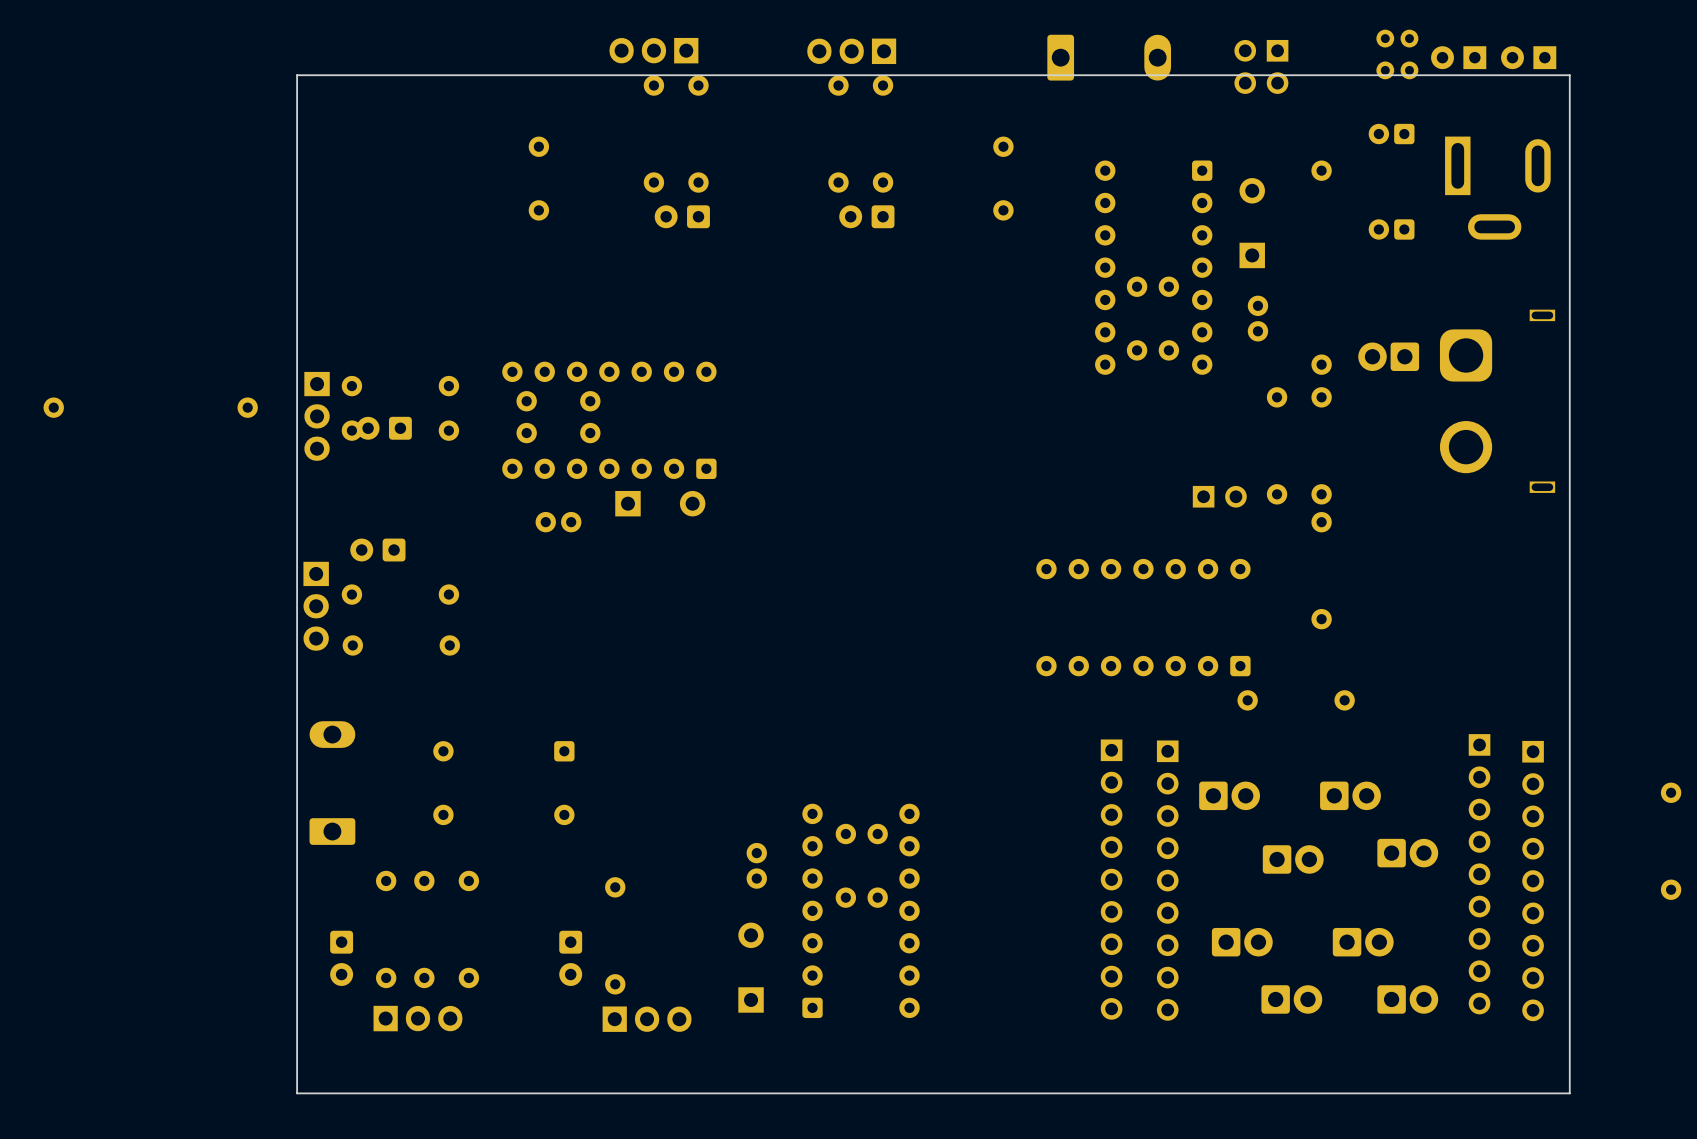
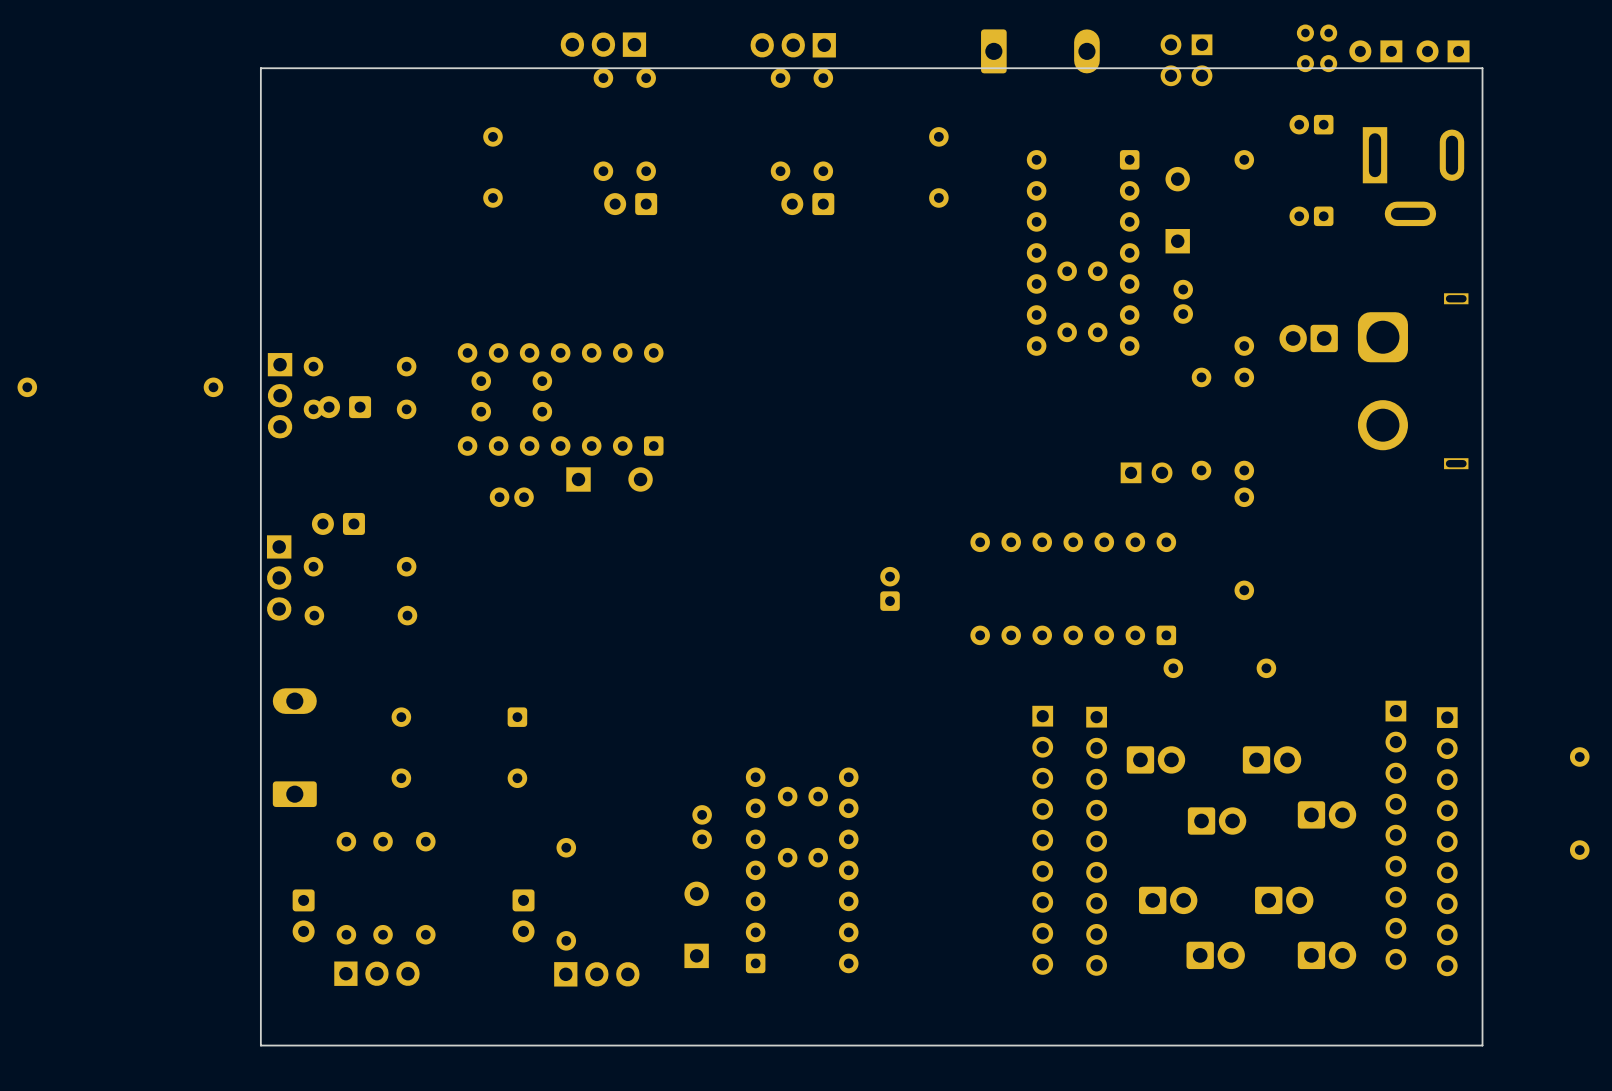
part: none -> (890, 588)

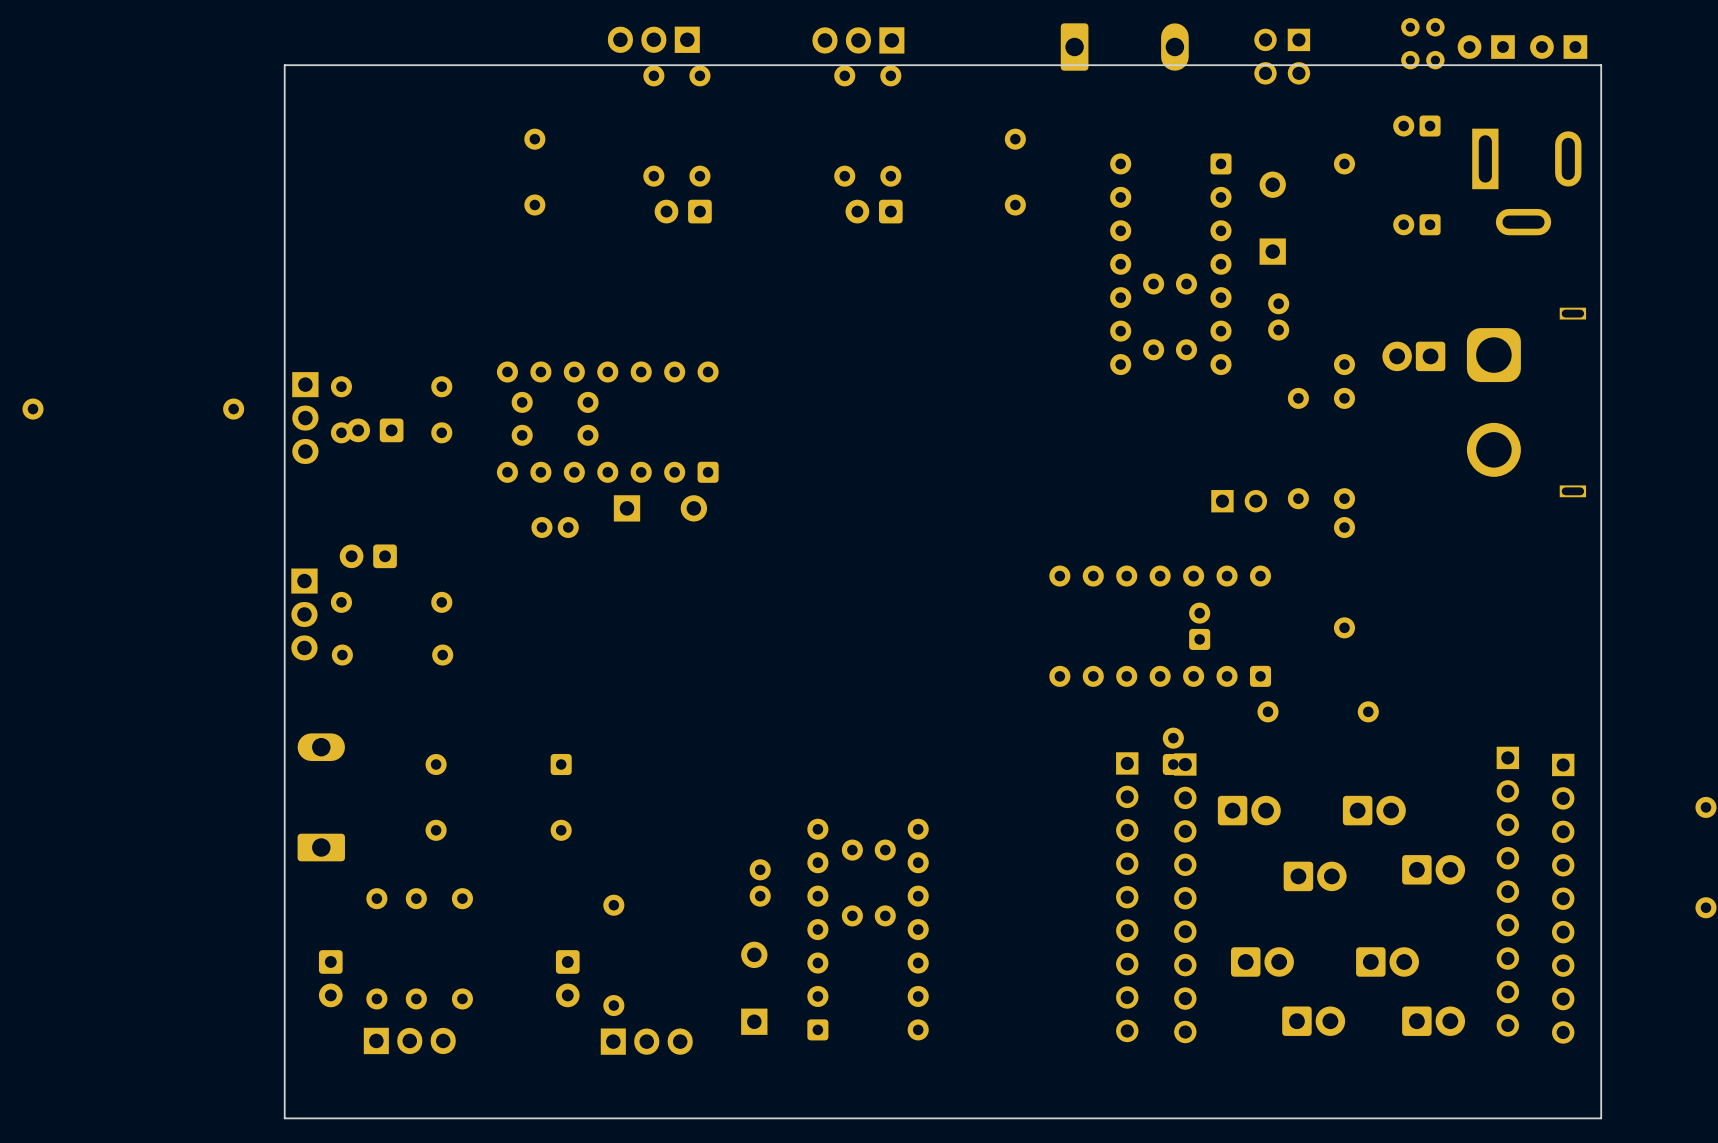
part: (890, 588) -> none
part: none -> (1199, 626)
part: none -> (1173, 751)

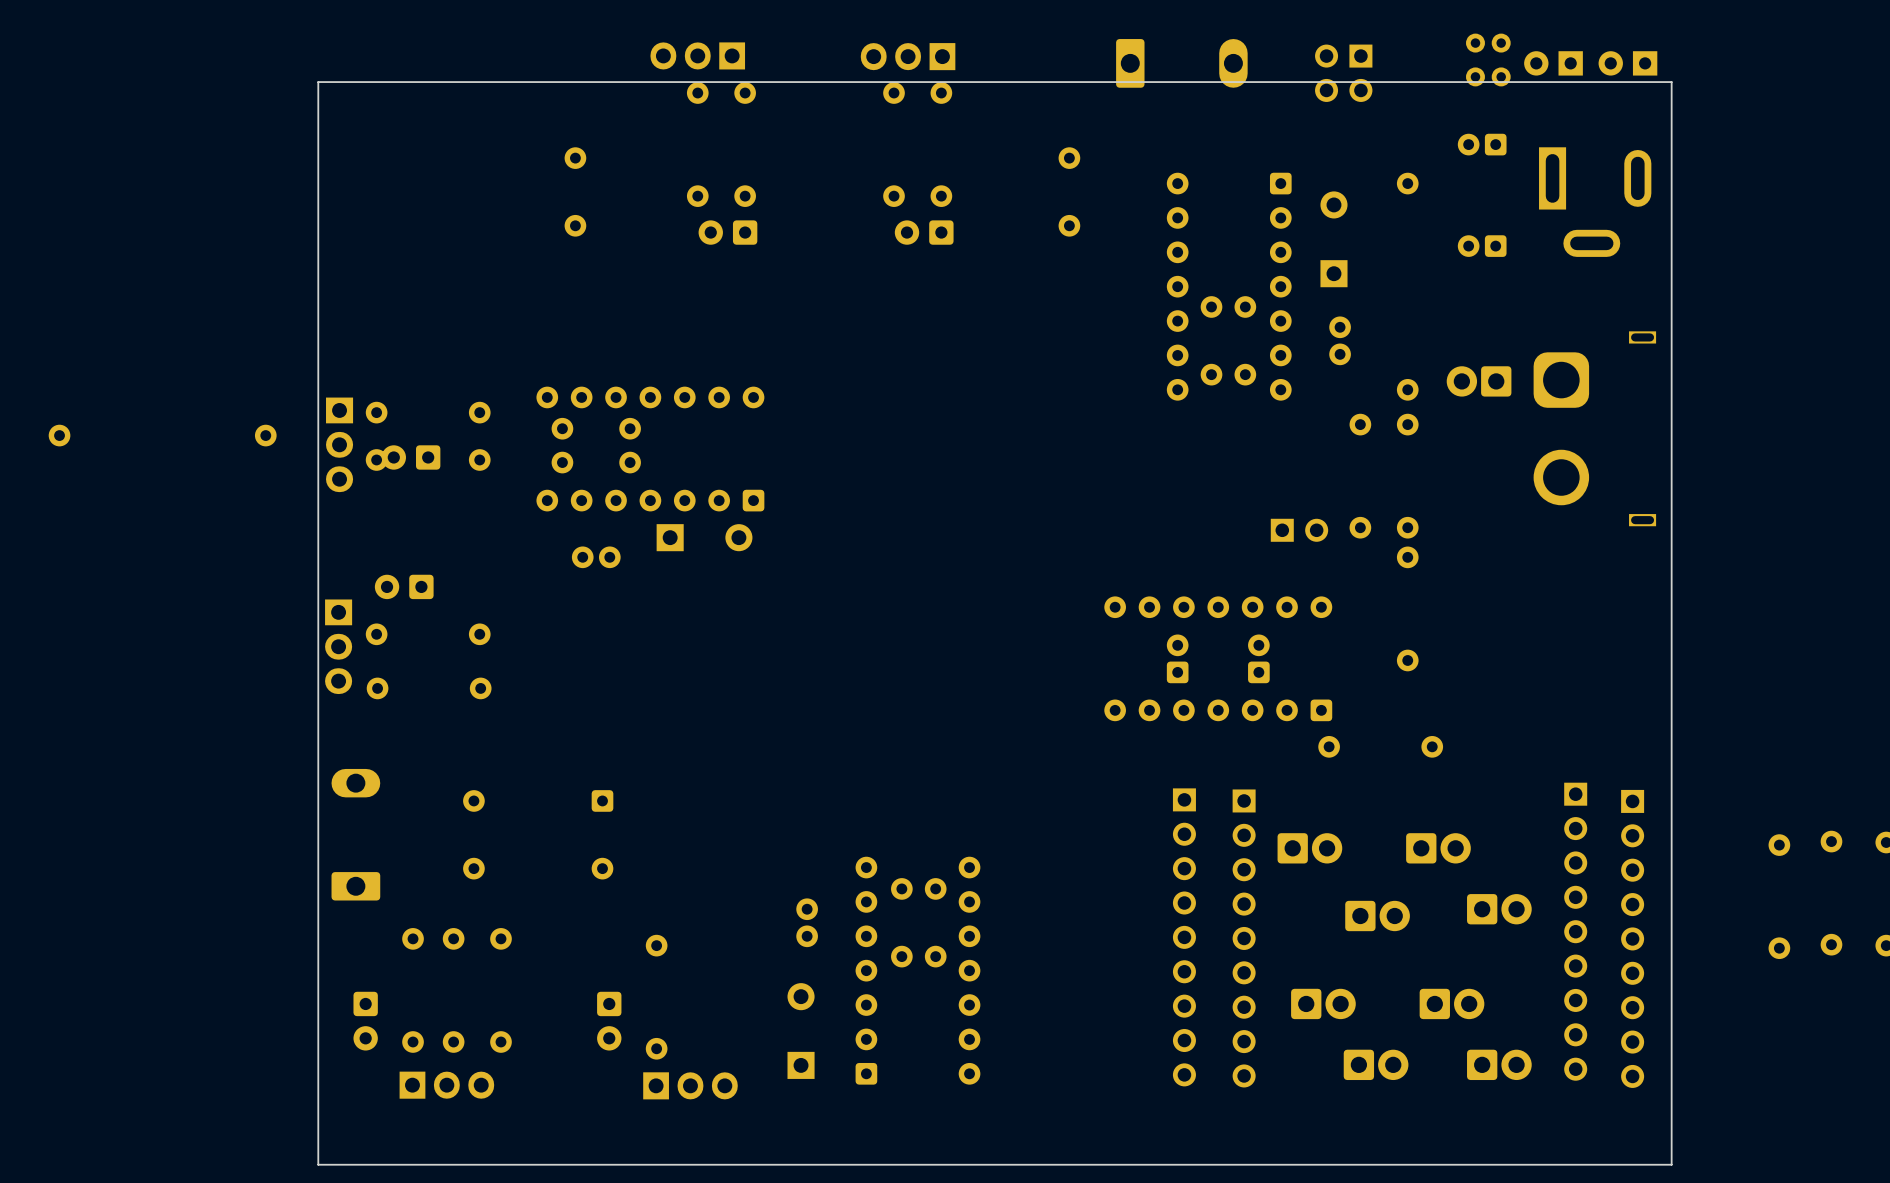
part position: (1173, 751) -> (1177, 658)

